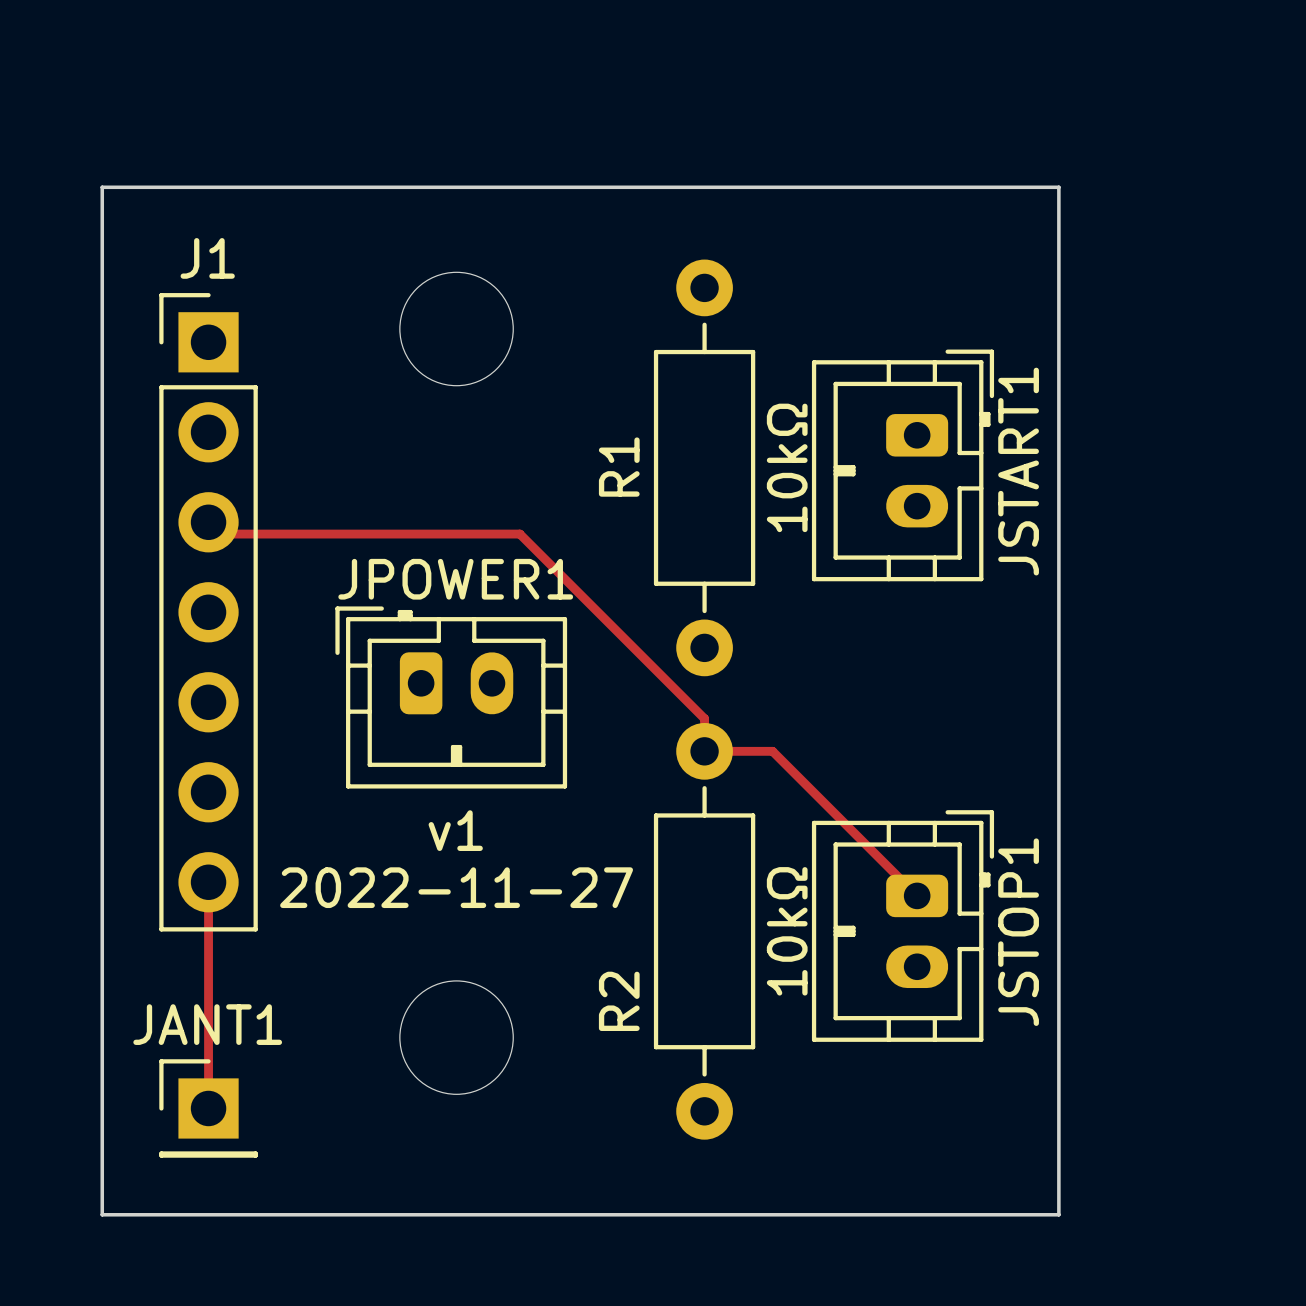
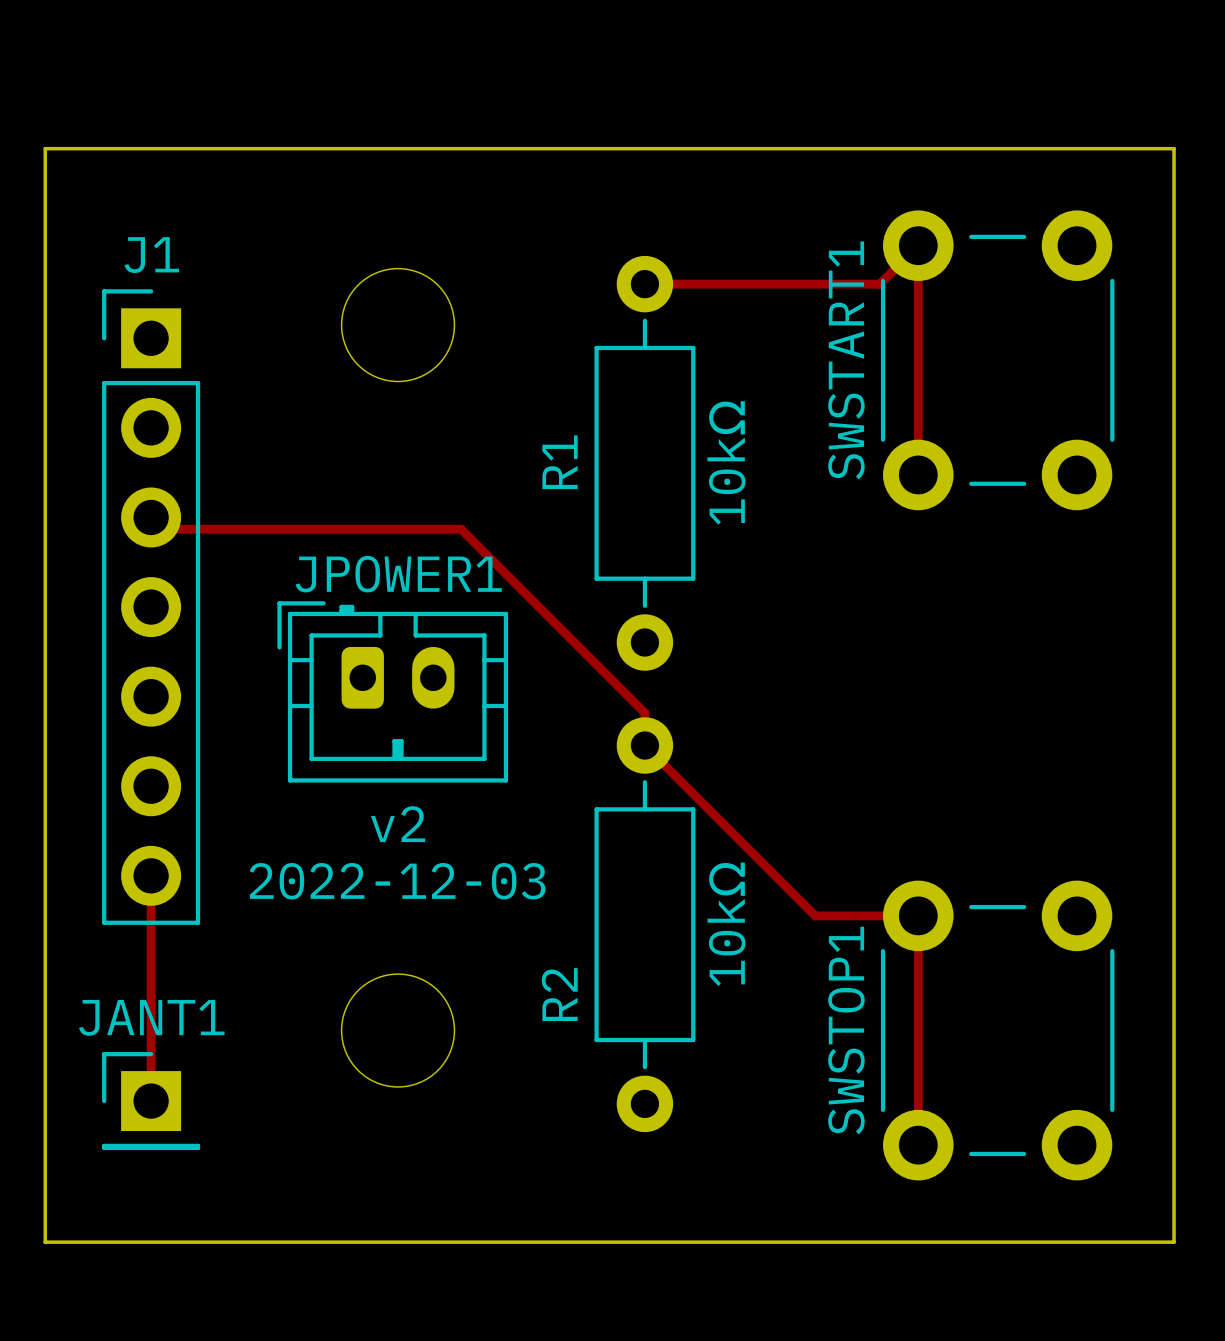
board edge: (102, 187) (1058, 187) (1058, 1214) (102, 1214) -> (45, 183) (45, 148) (1174, 148) (1174, 1242) (45, 1242) (45, 1206)
track: none -> (644, 284) (879, 284) (918, 245) (918, 474)
SWSTART1: none -> (997, 360)
JSTART1: (902, 465) -> none
track: (704, 751) (772, 751) (917, 895) -> (644, 745) (815, 915) (918, 915) (918, 1145)
text: v1 (455, 830) -> v2 (398, 824)
text: 2022-11-27 (456, 887) -> 2022-12-03 (397, 881)
JSTOP1: (902, 926) -> none
SWSTOP1: none -> (997, 1030)

